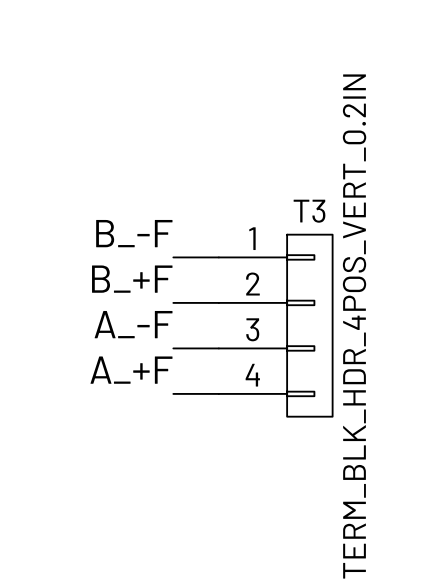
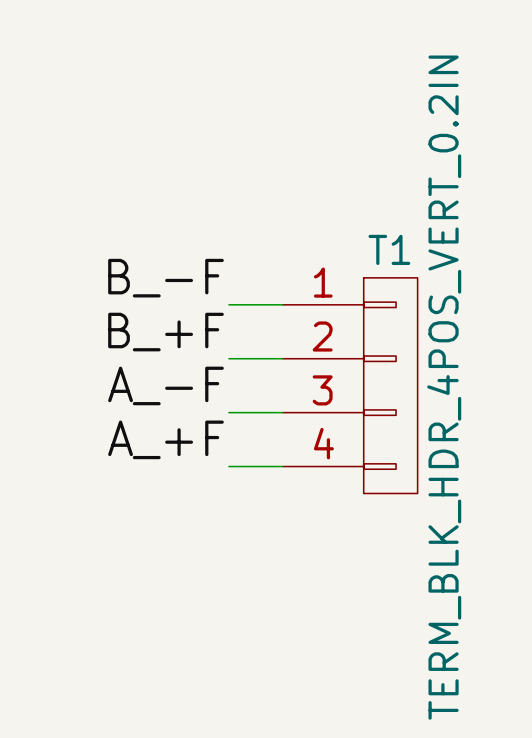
T3 name: T3 (309, 211) -> T1 (389, 249)

